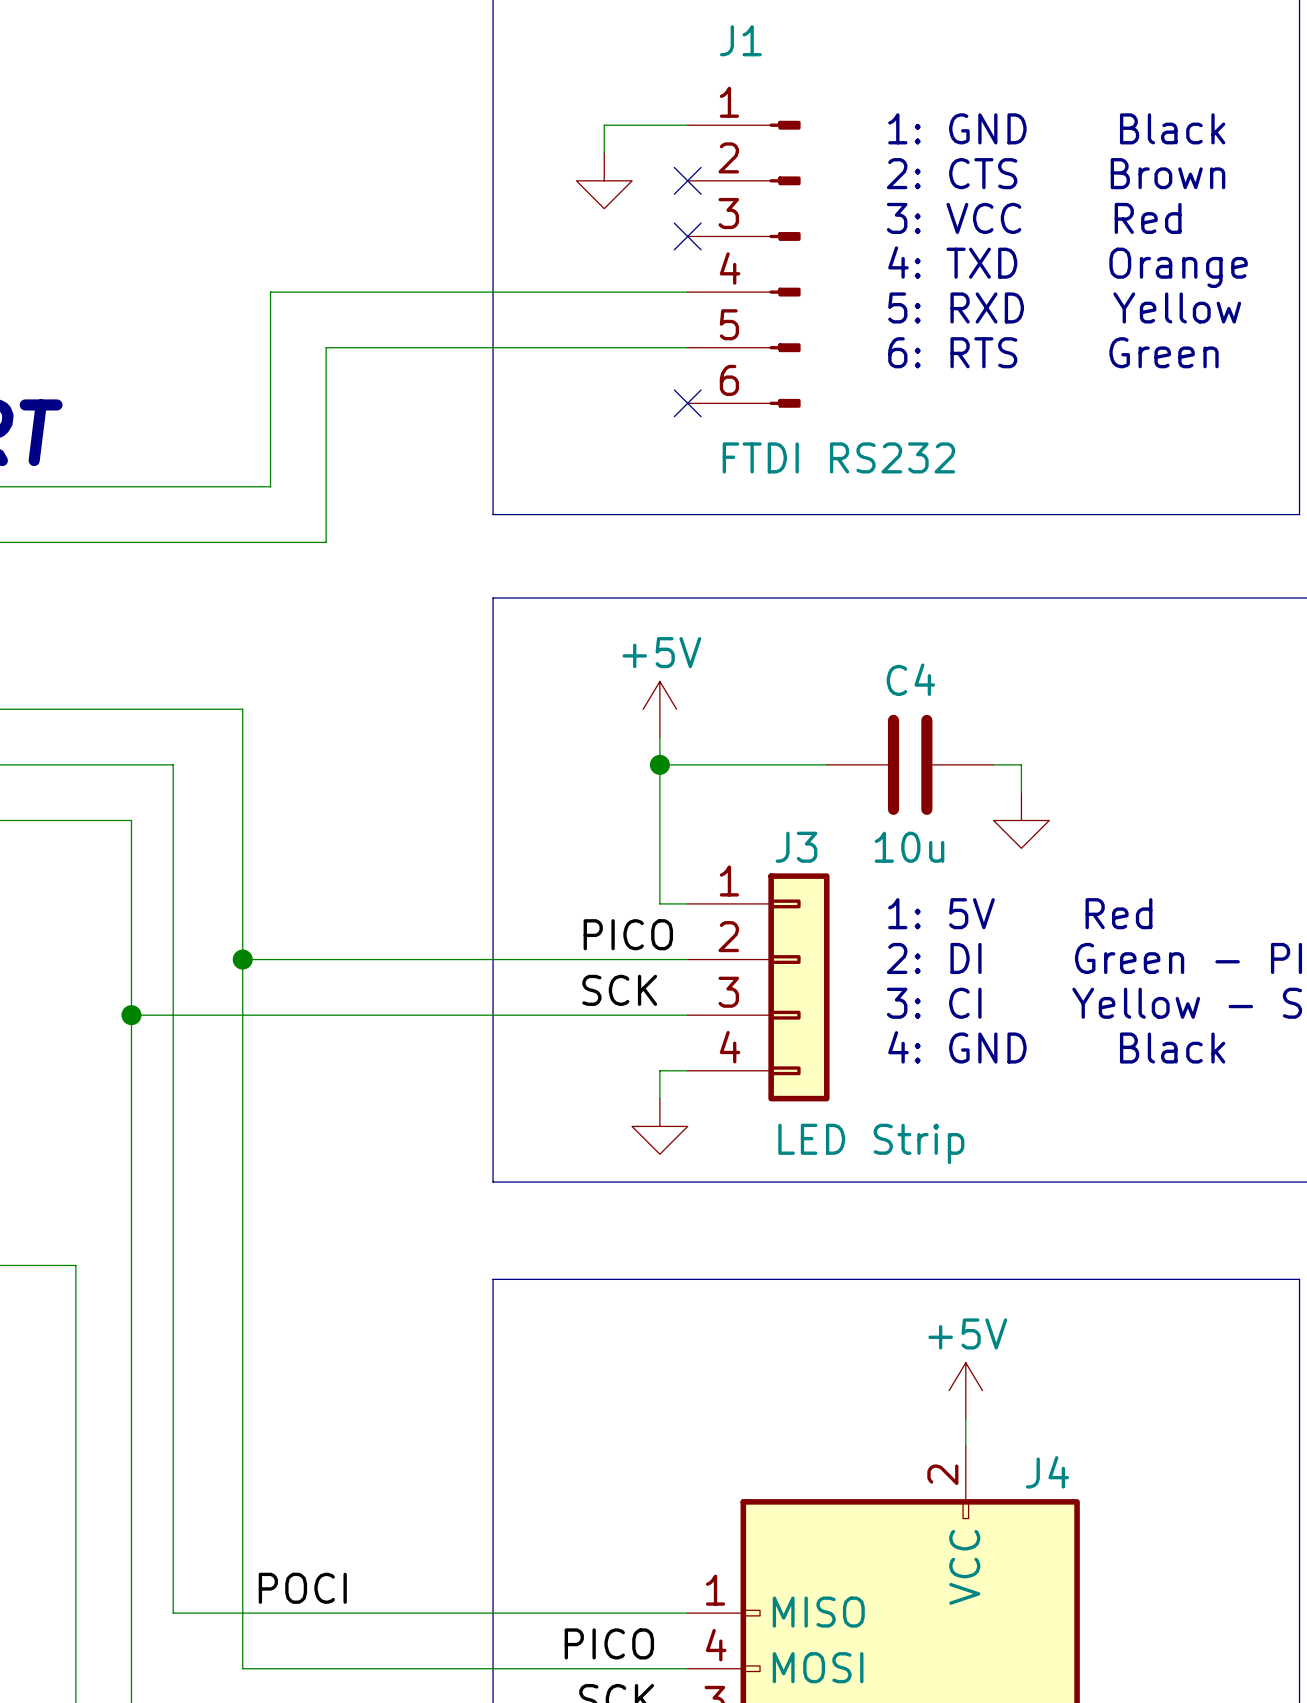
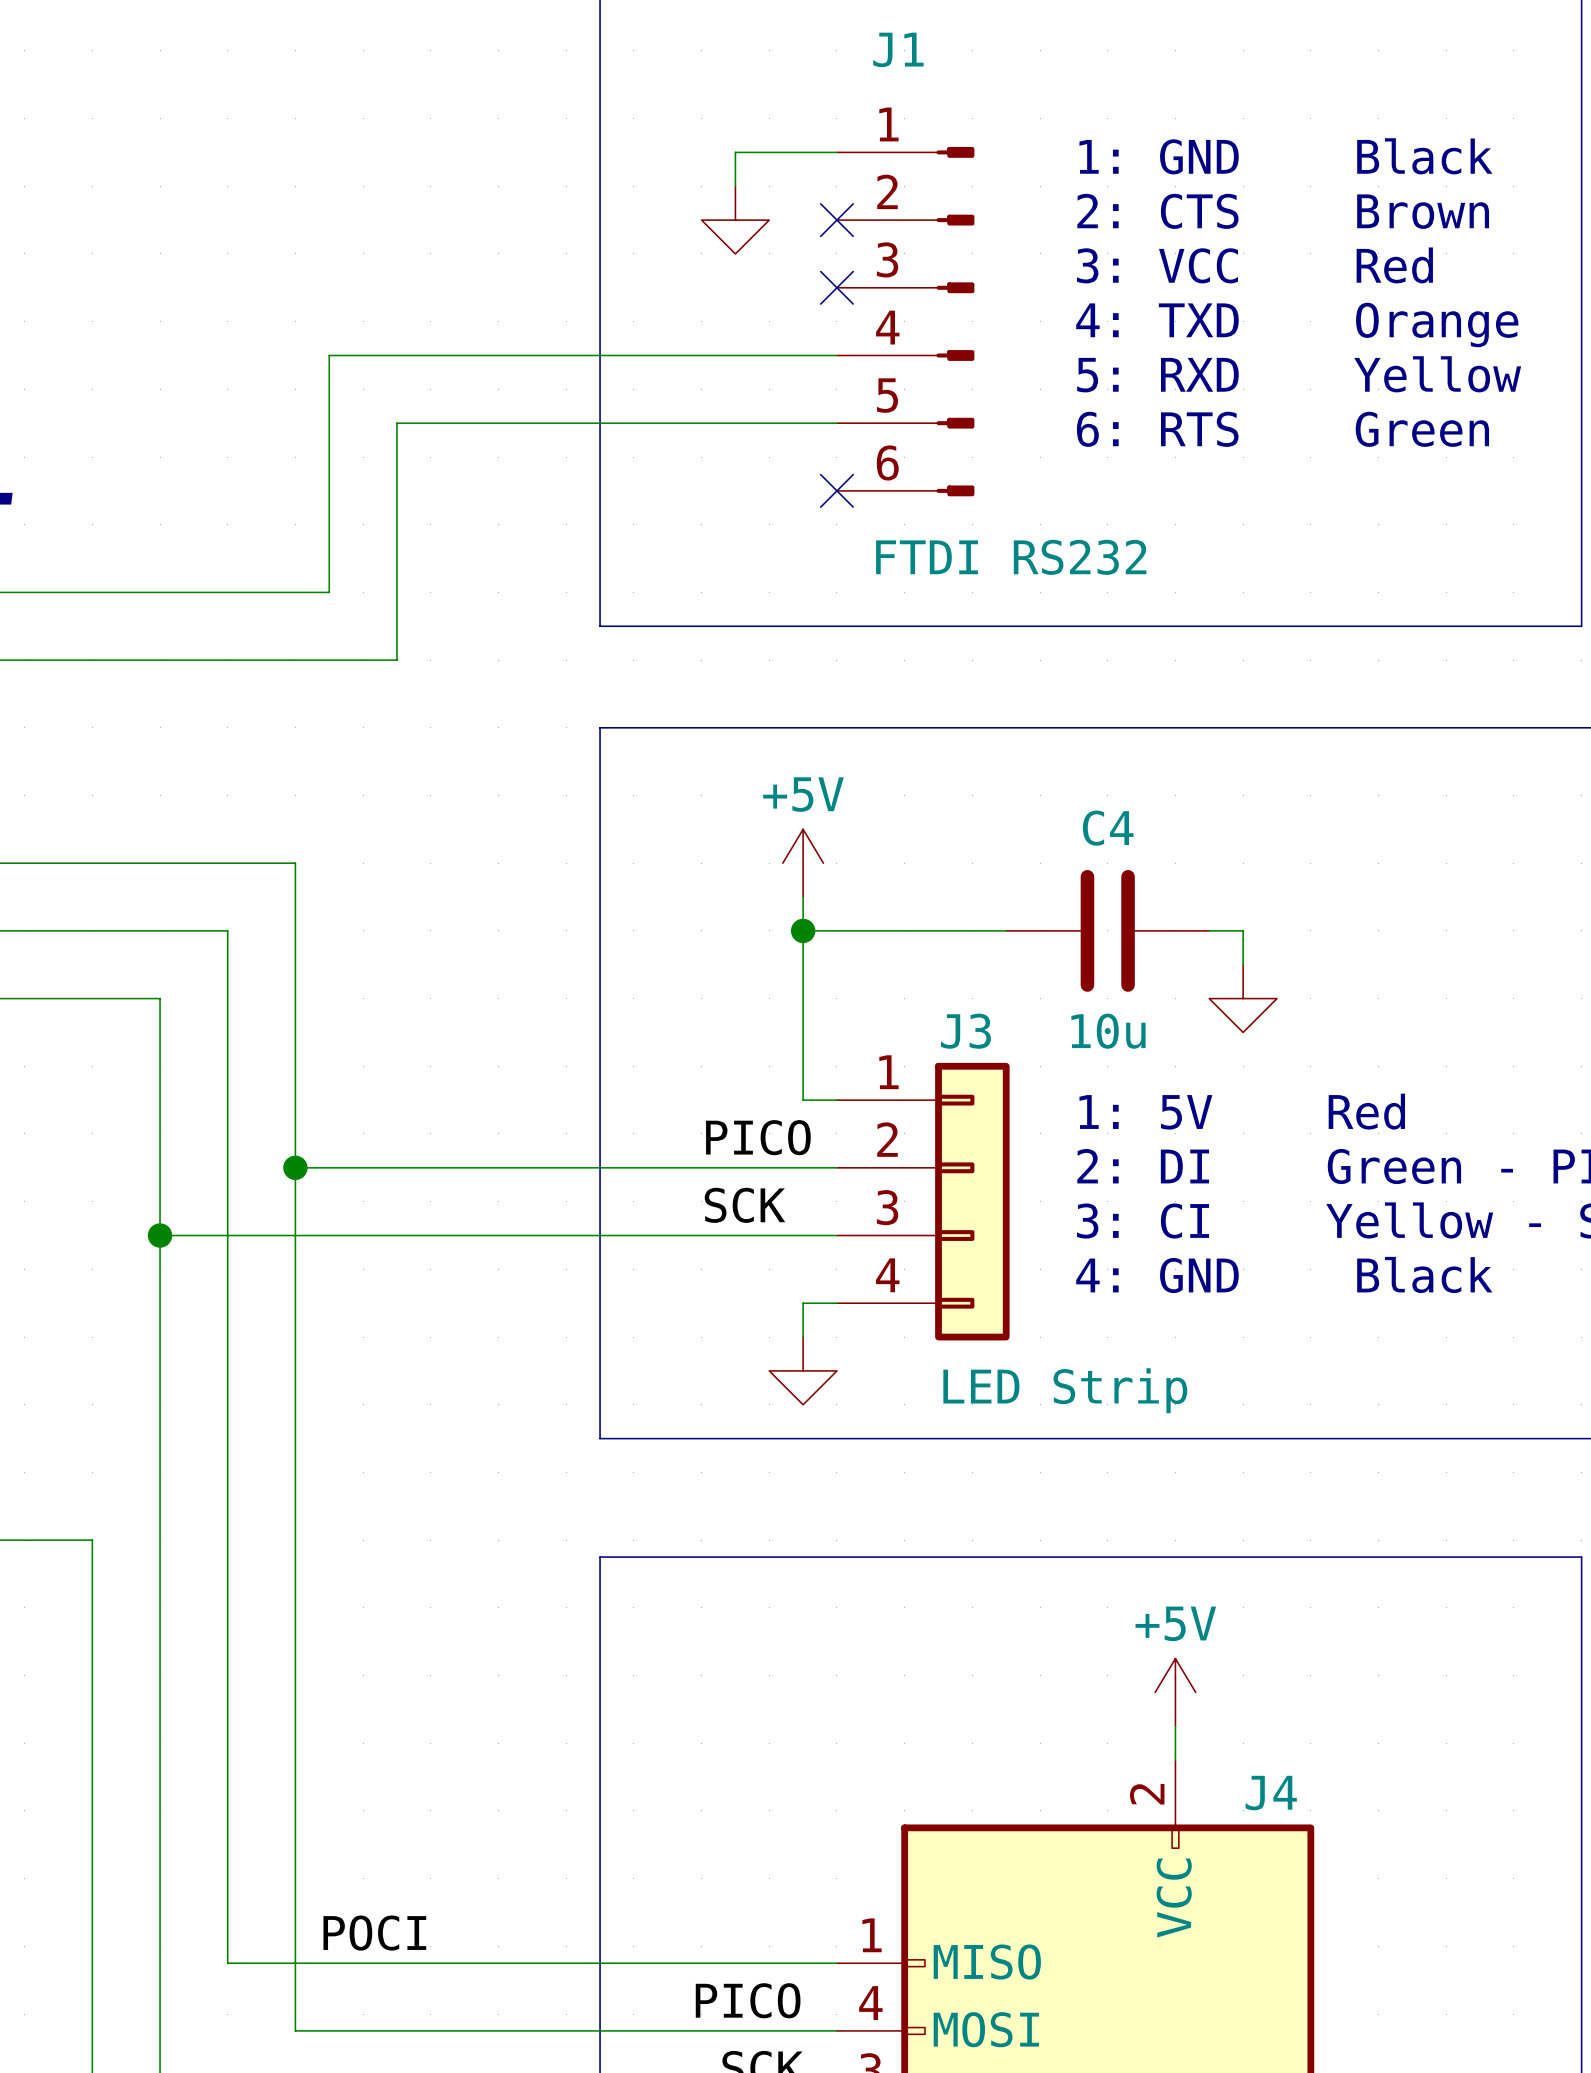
wire: (173, 764) (173, 1613) (187, 1613) -> (210, 930) (227, 930) (227, 1963)

